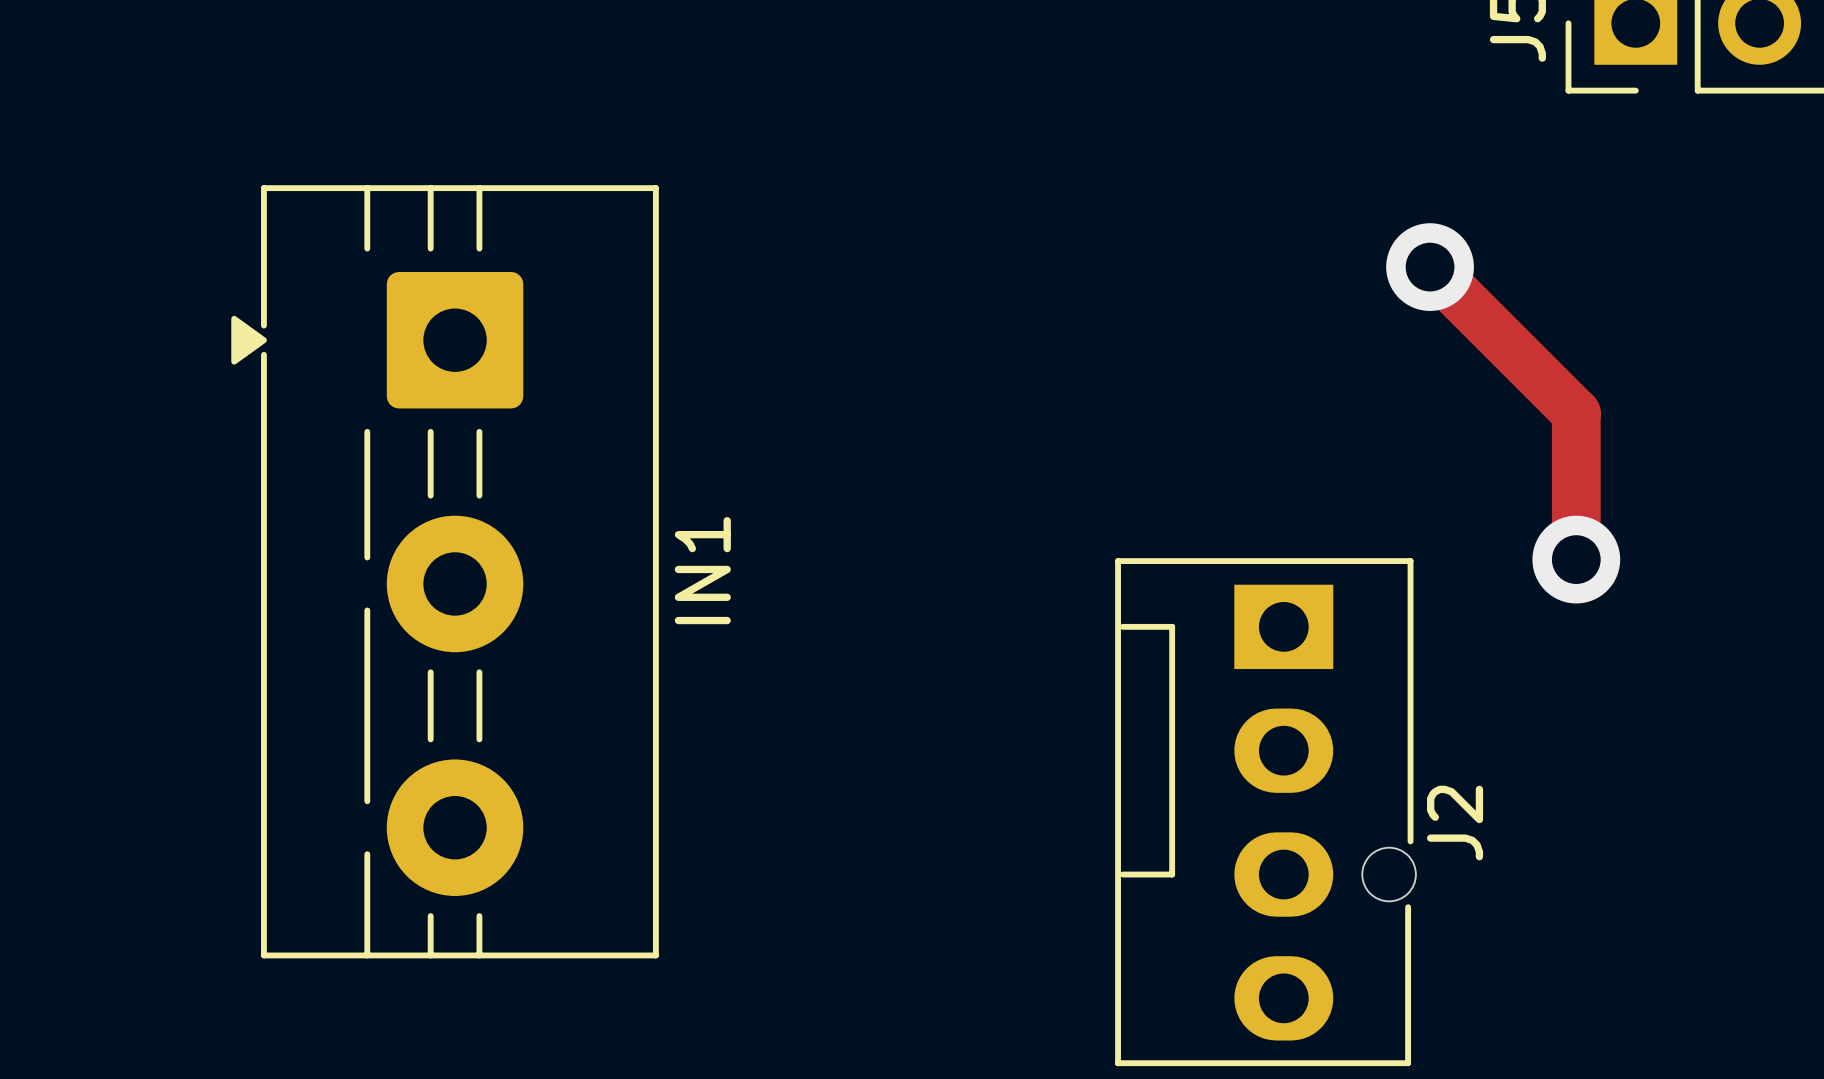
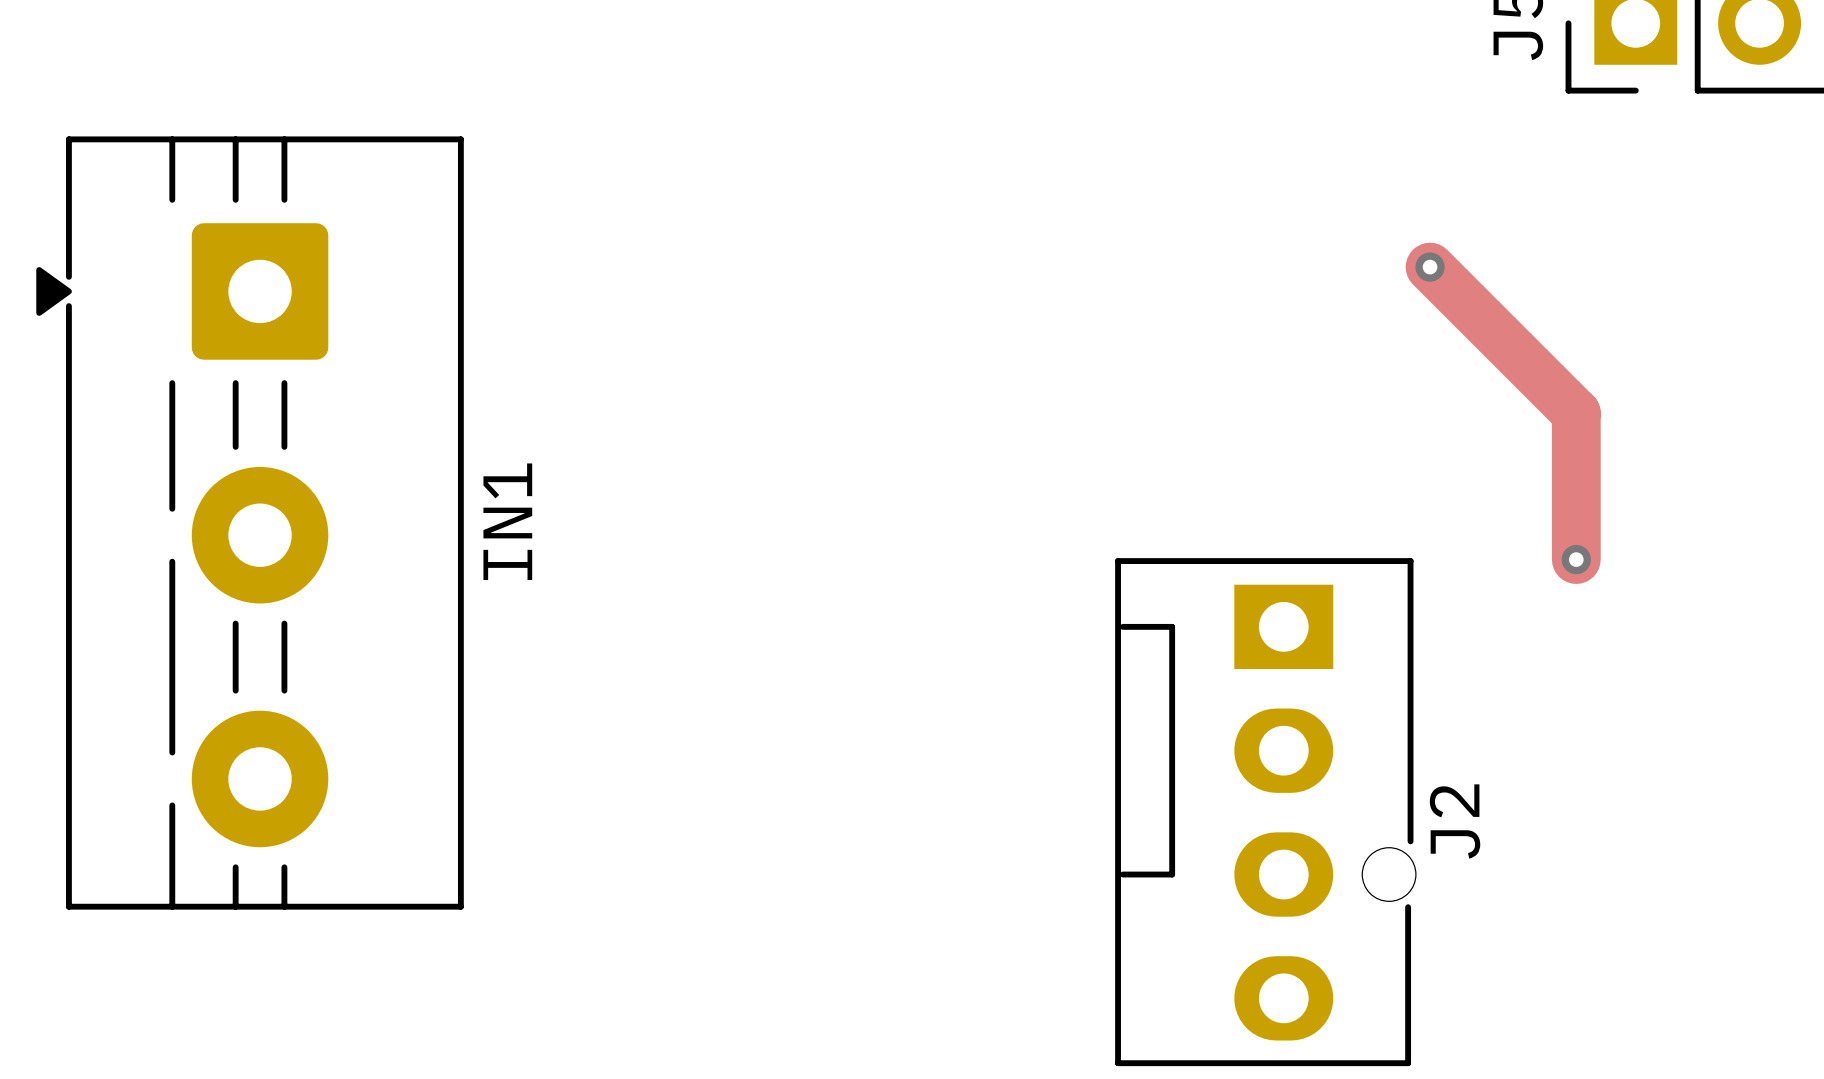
via size: [1386, 223, 1474, 311] -> [1415, 252, 1445, 282]
via size: [1532, 515, 1621, 604] -> [1561, 544, 1591, 575]
IN1 position: (445, 571) -> (250, 523)

